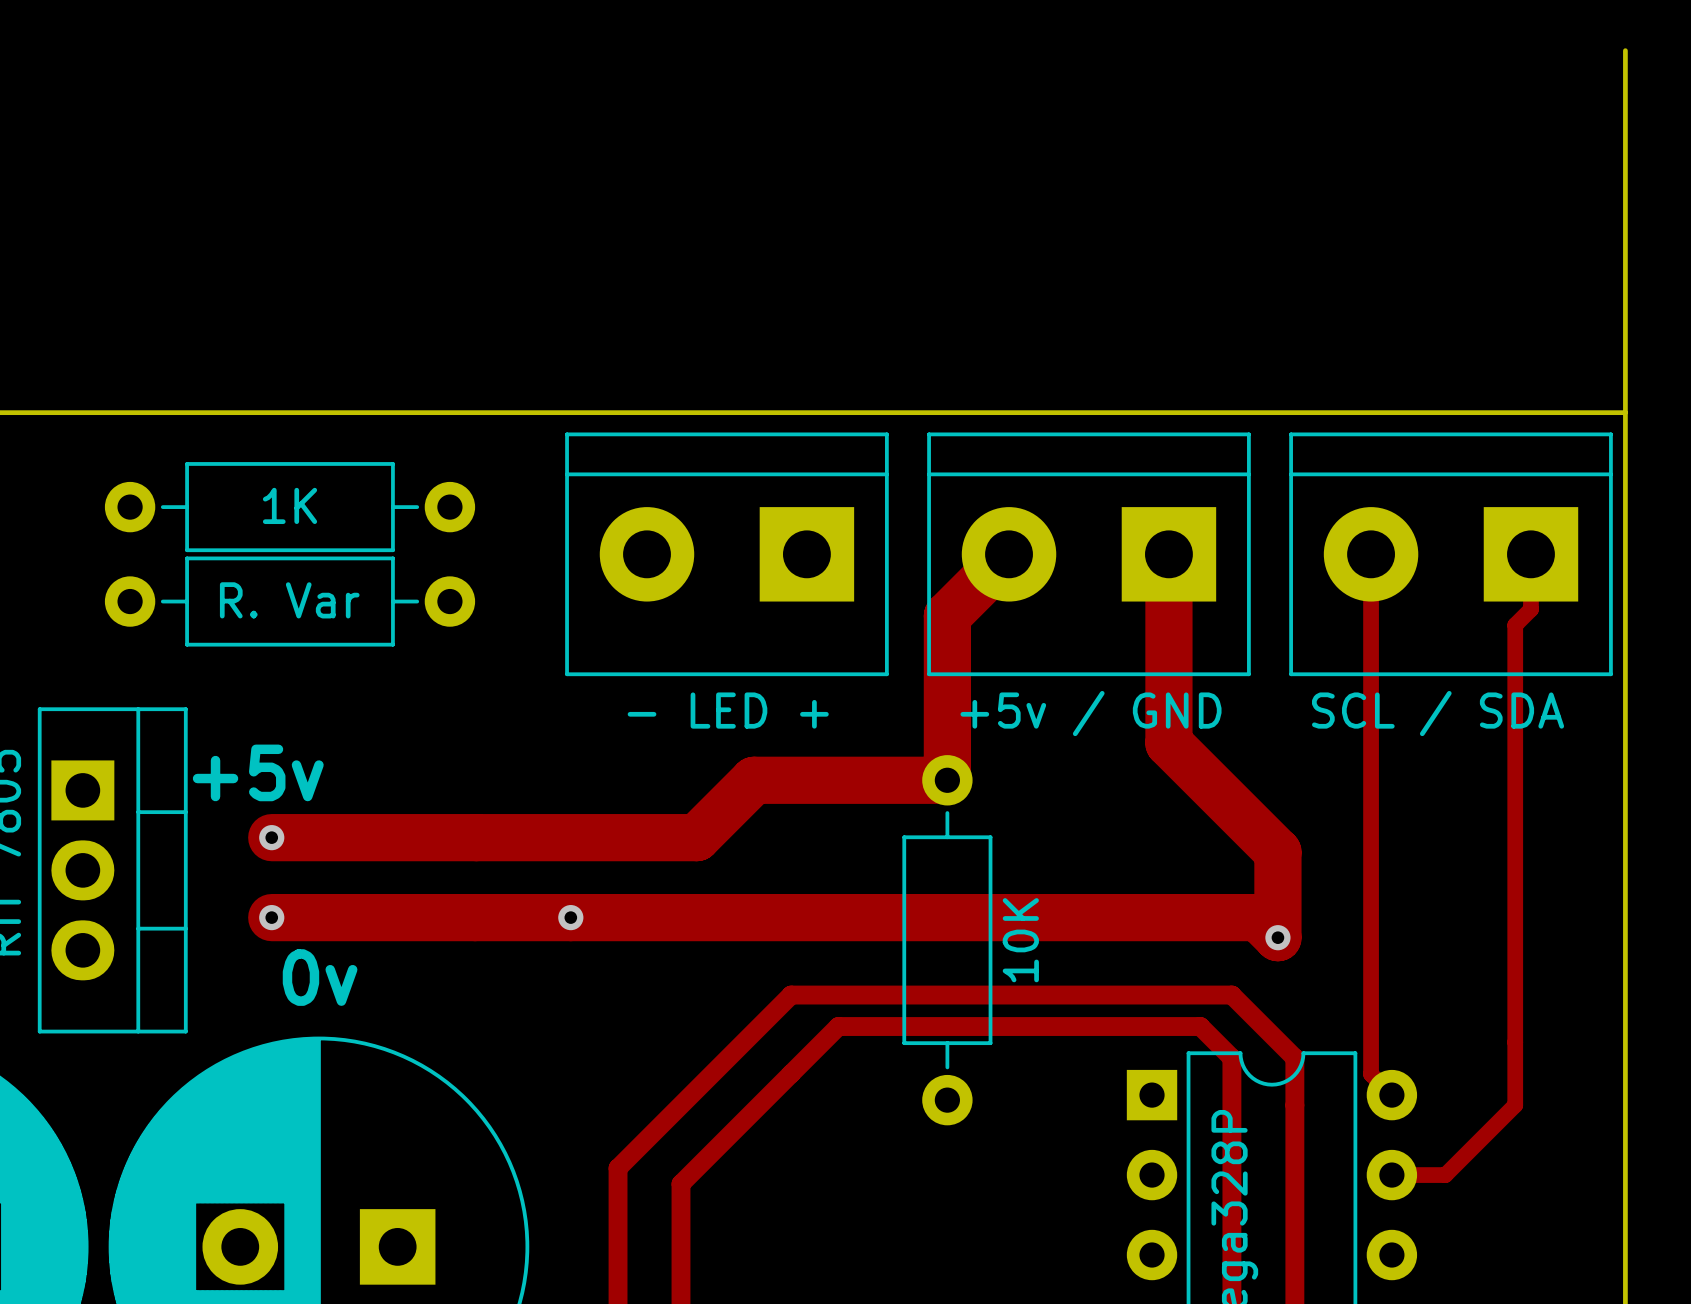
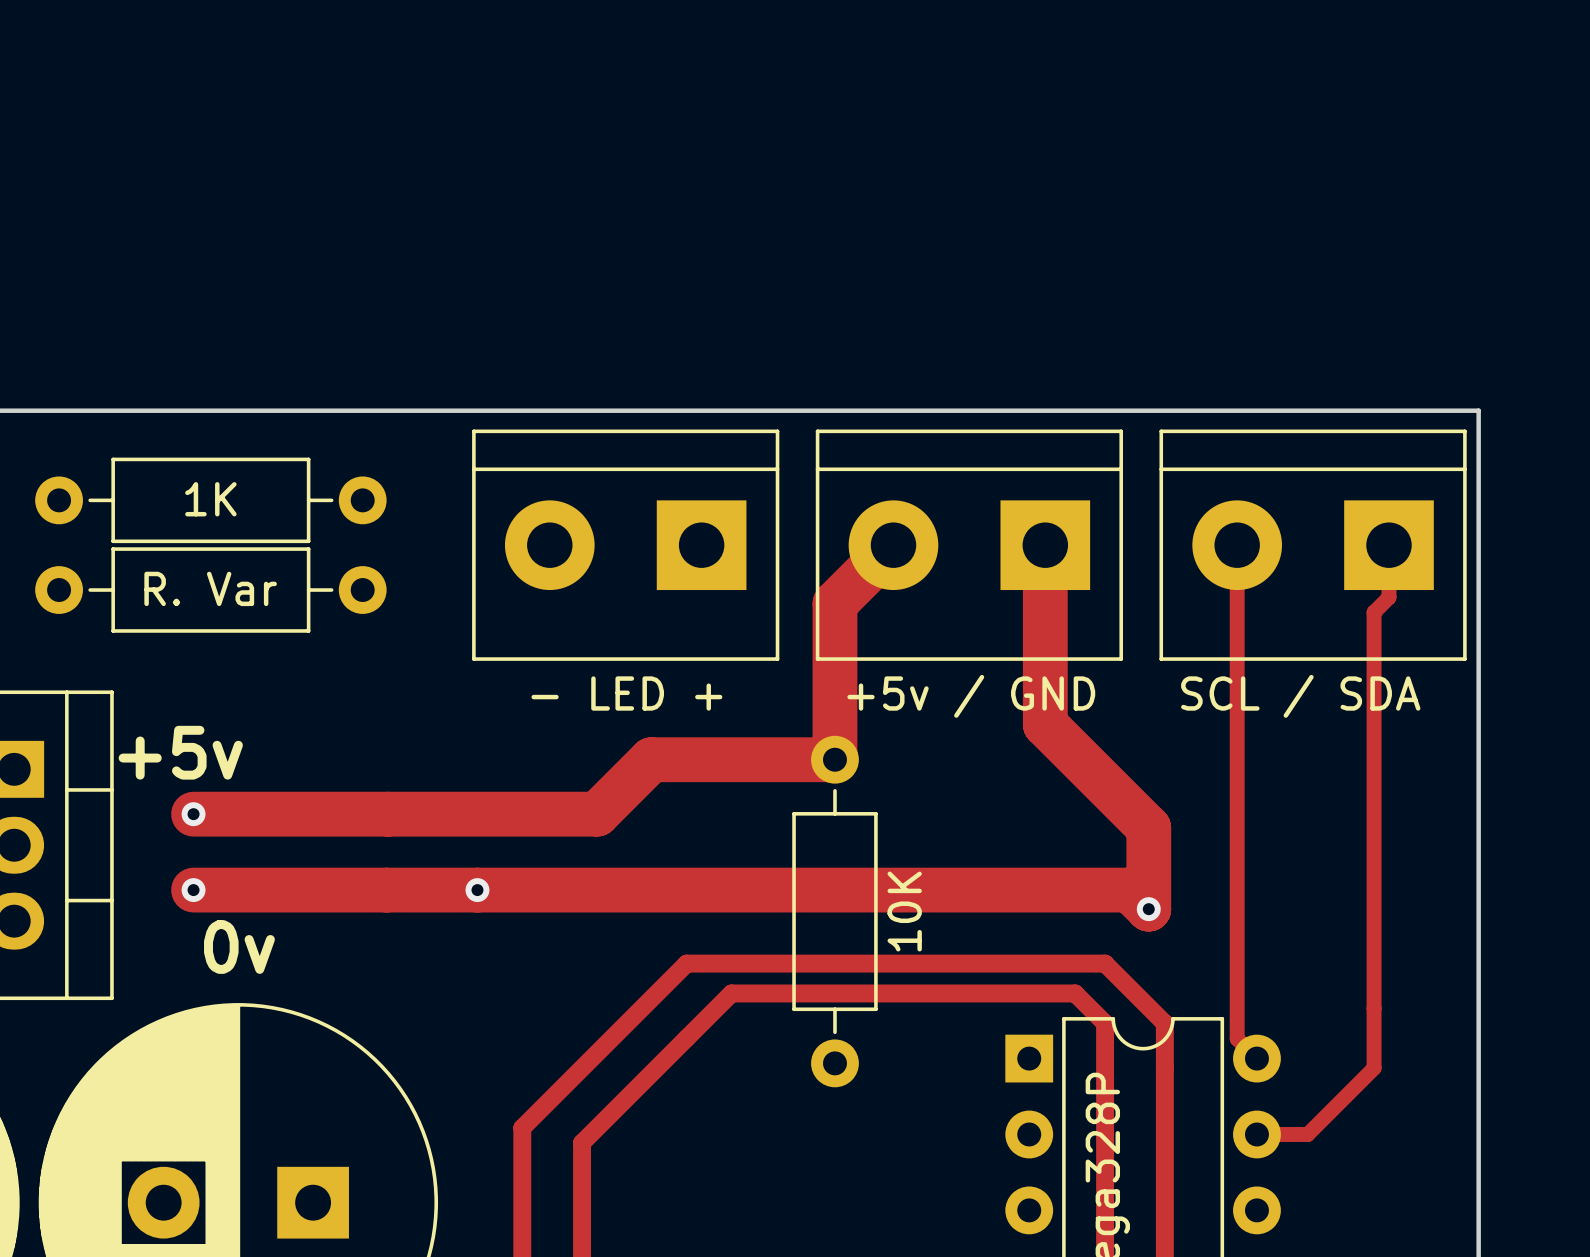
board edge: (1625, 50) (1625, 412) -> none

